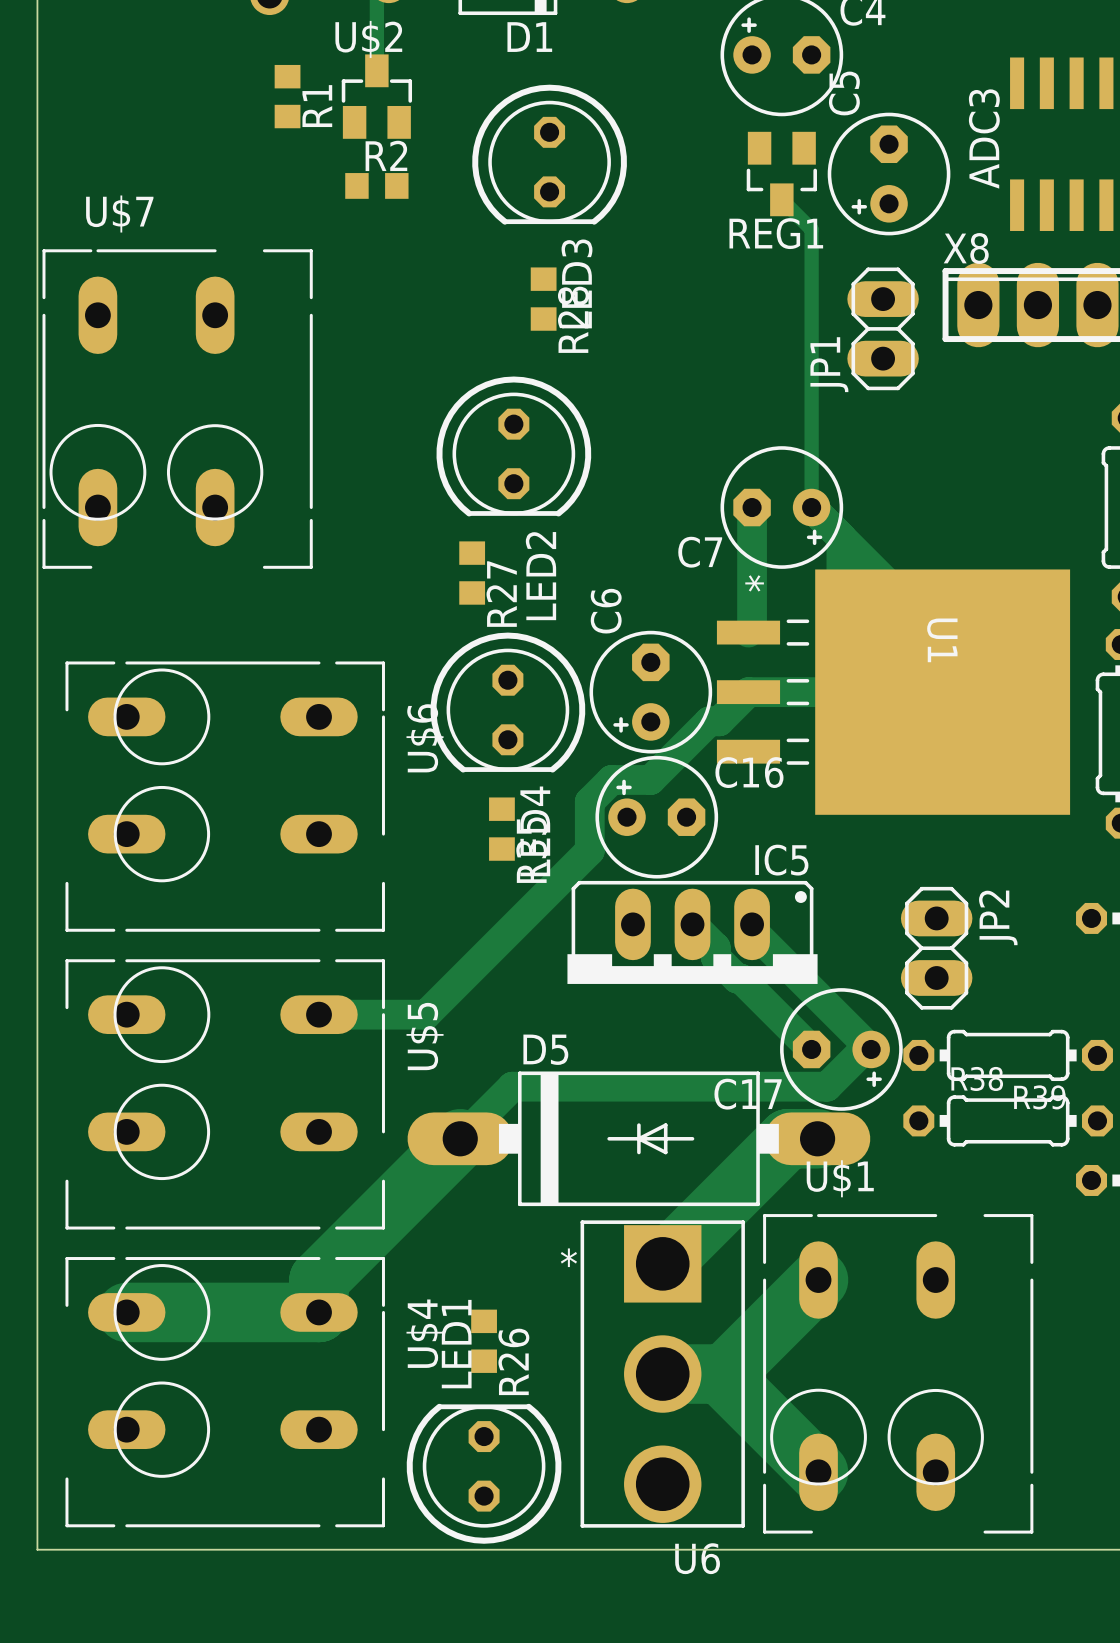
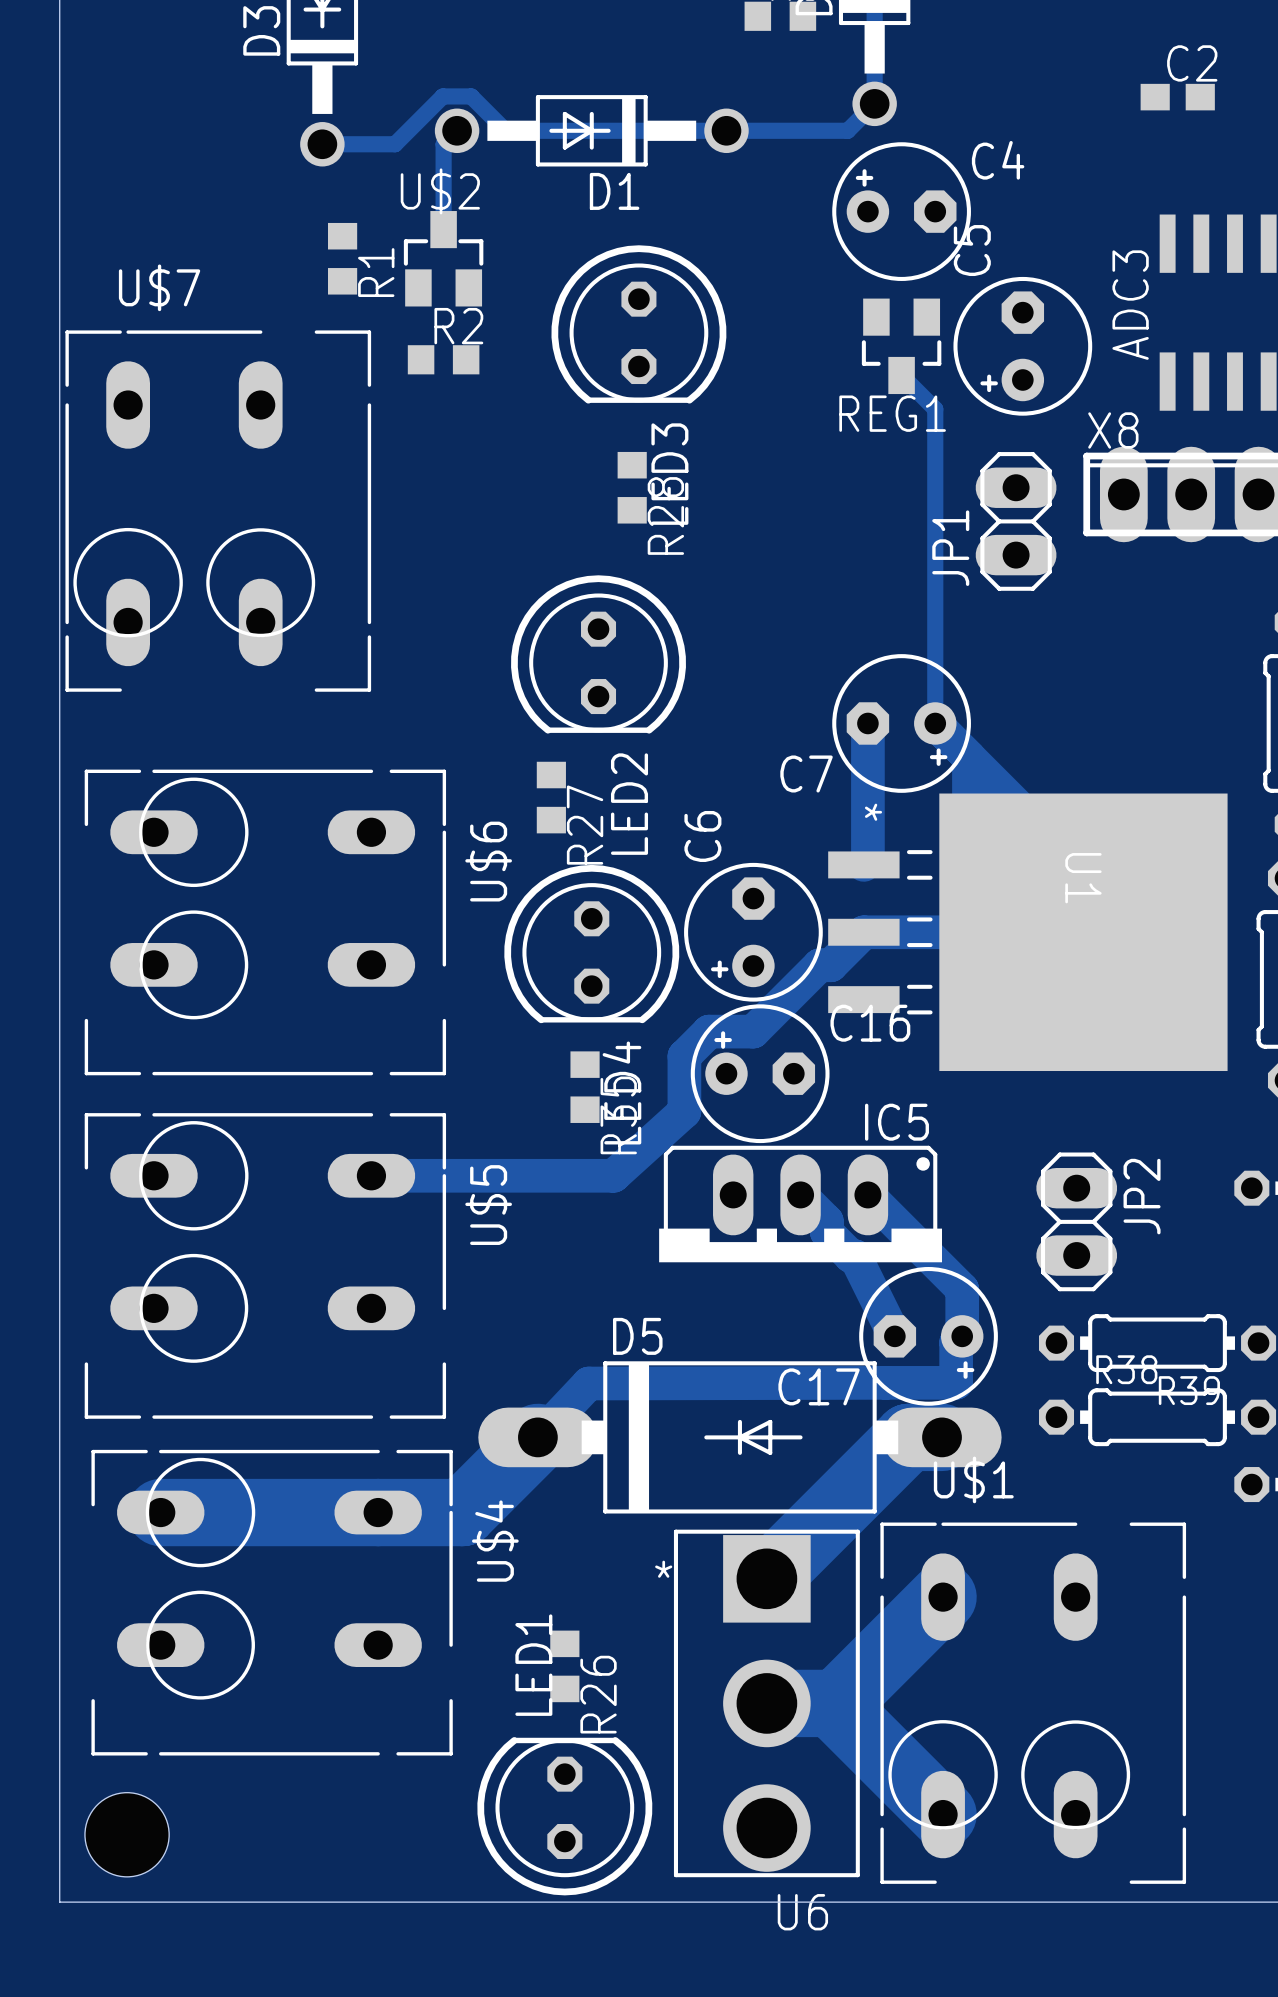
U$7 position: (177, 409) -> (218, 511)
U$6 position: (225, 796) -> (265, 922)
track: (589, 850) (425, 1014) (319, 1014) -> (684, 1111) (613, 1175) (371, 1175)
track: (752, 930) (871, 1049) (864, 1049) (827, 1086) (512, 1086) (460, 1138) -> (867, 1194) (962, 1289) (962, 1336) (956, 1342) (956, 1382) (588, 1383) (537, 1437)
track: (740, 978) (811, 1049) -> (855, 1256) (894, 1336)
C17 position: (841, 1049) -> (928, 1336)
U$5 position: (225, 1094) -> (265, 1265)
track: (393, 1205) (319, 1280) (319, 1312) (126, 1312) -> (462, 1512) (160, 1512)
U$4 position: (225, 1392) -> (272, 1602)
hole: none -> (127, 1834)

